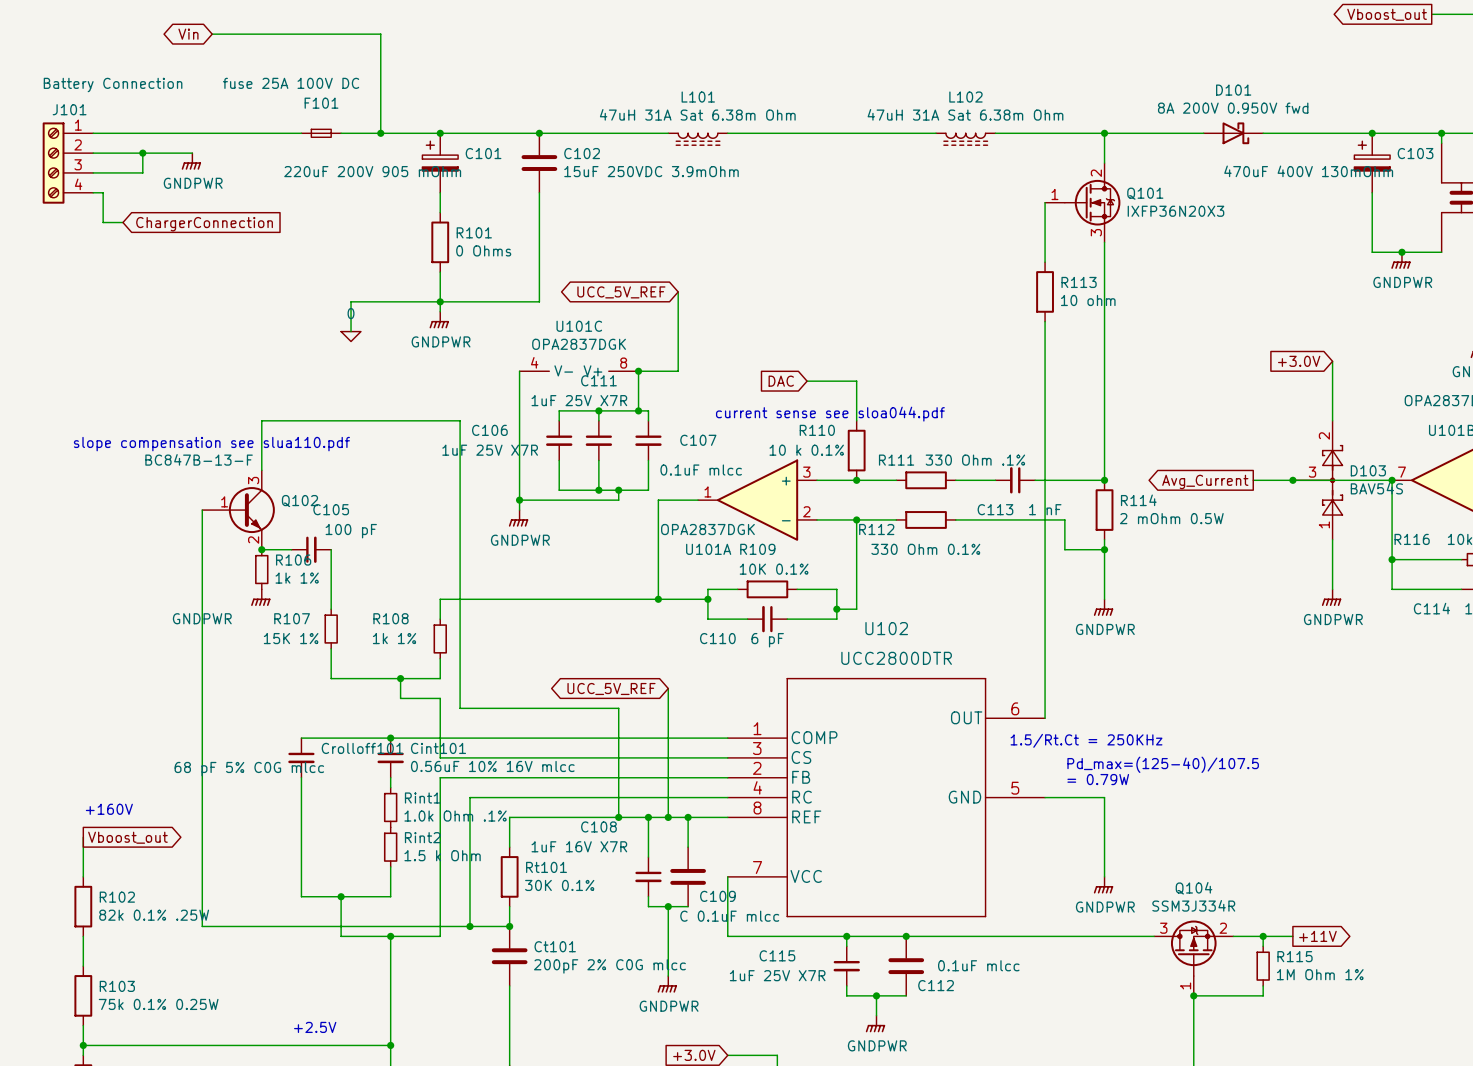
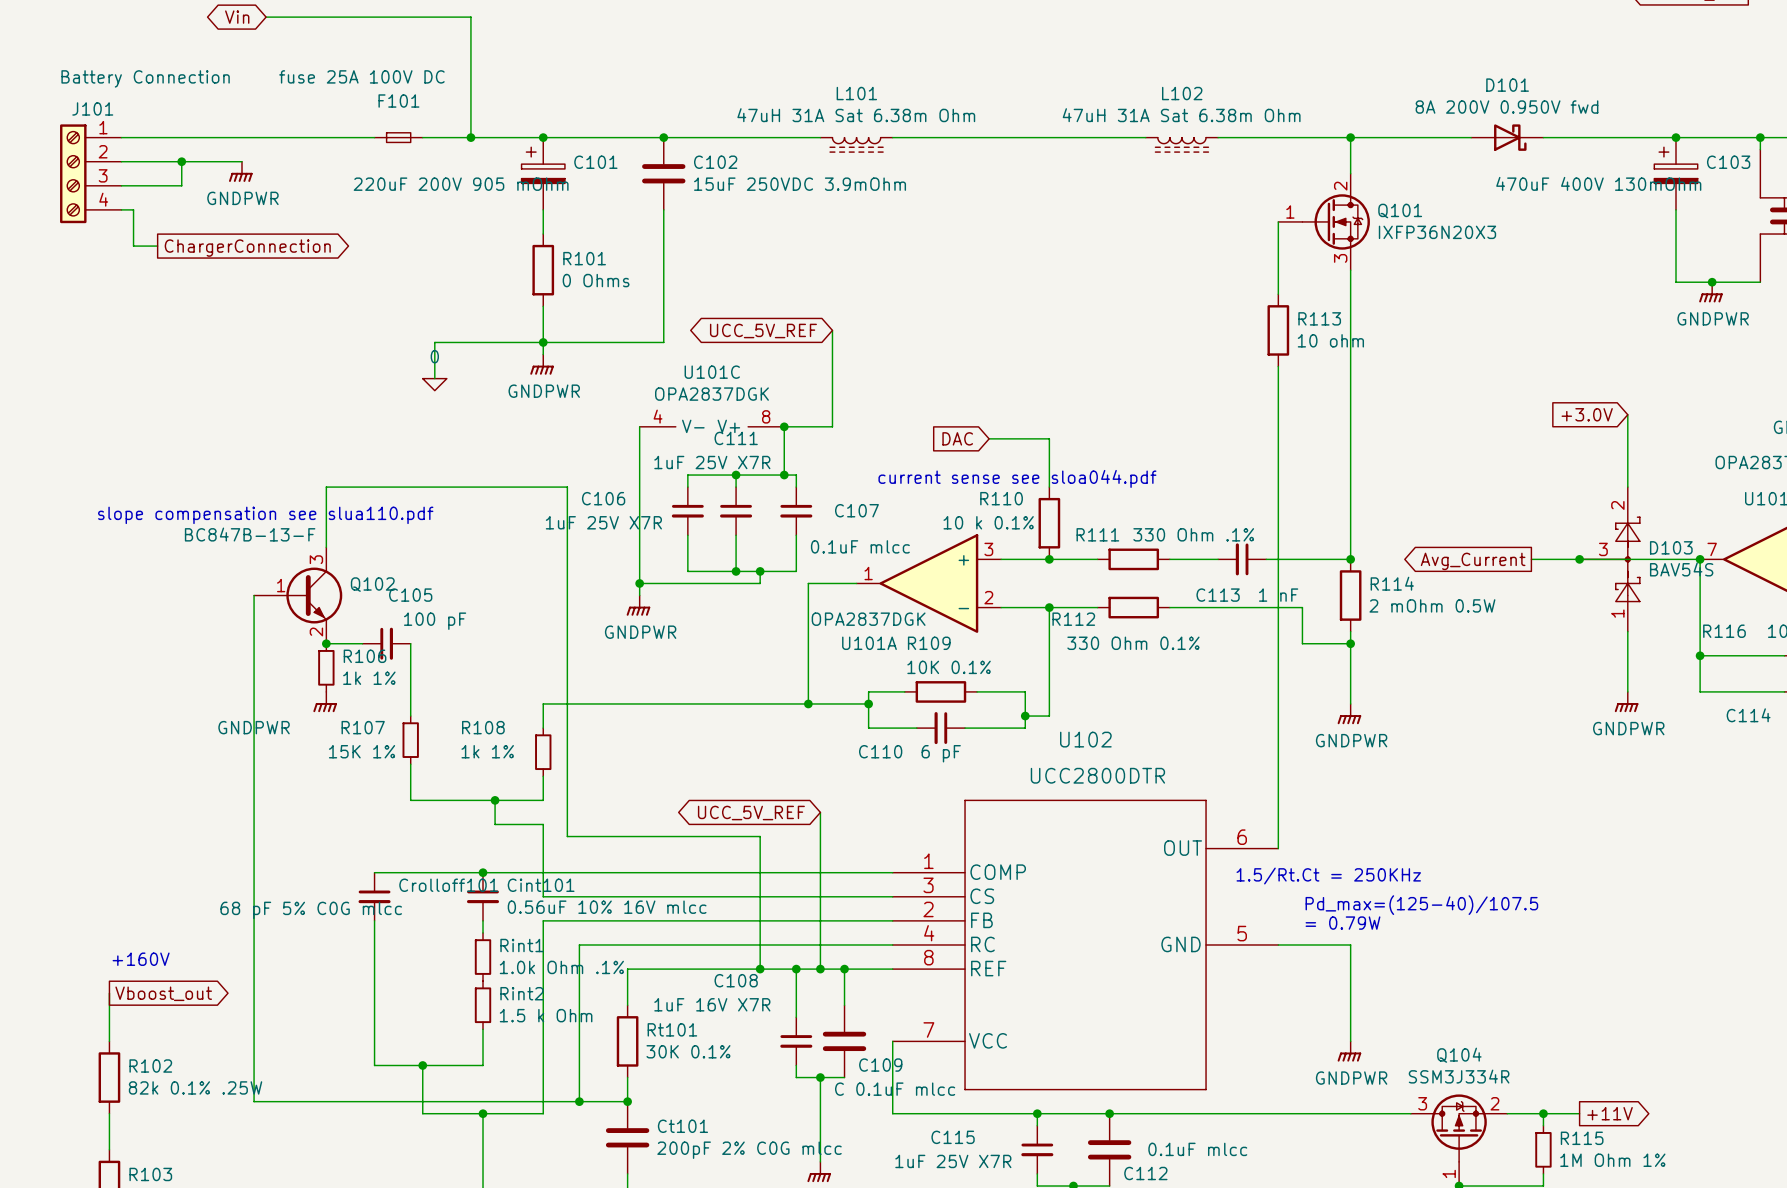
global label shape: input (204, 224) -> output (247, 248)

